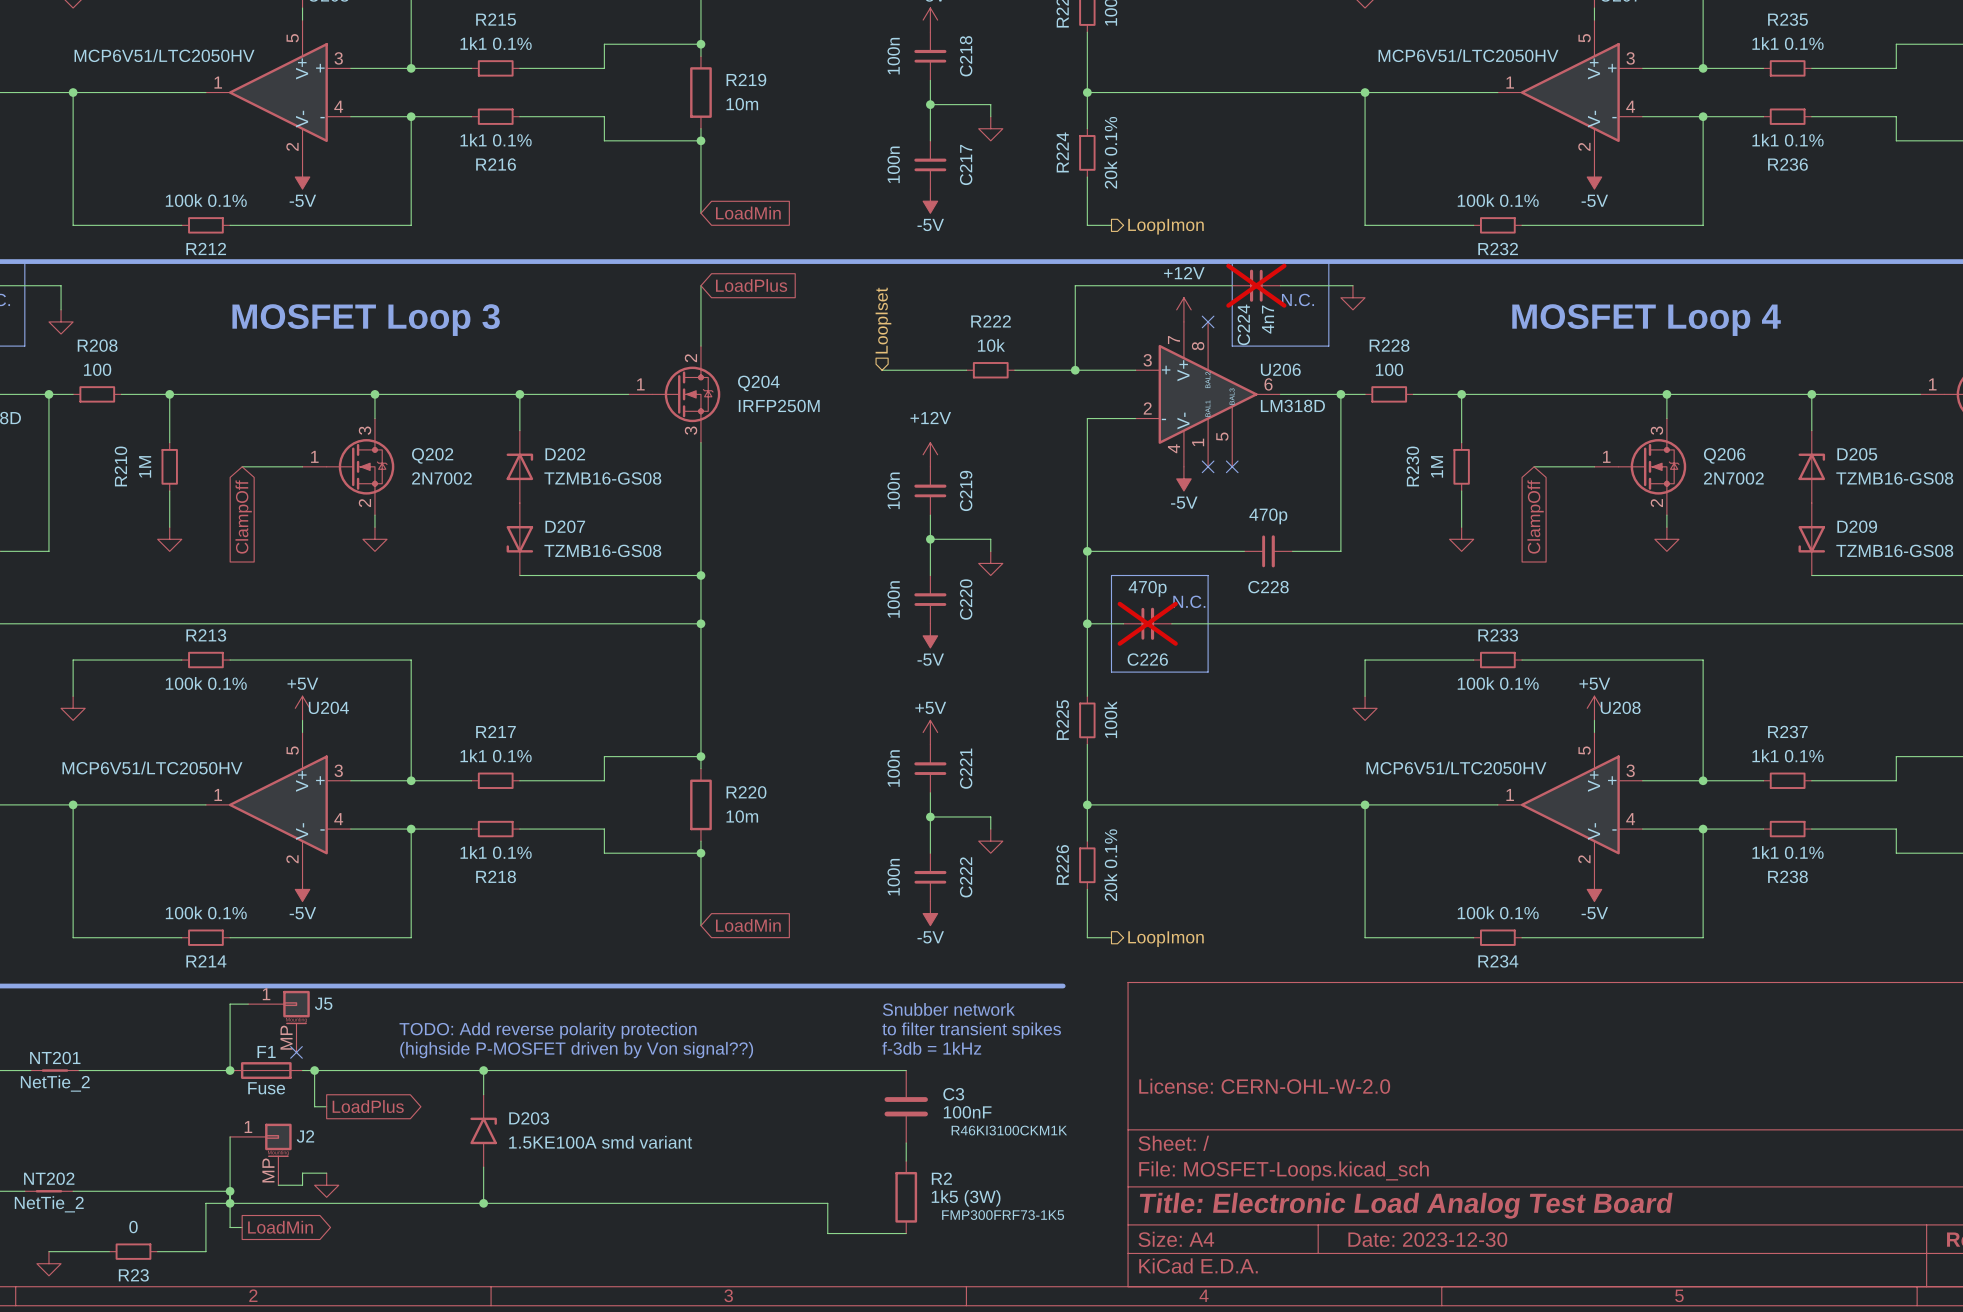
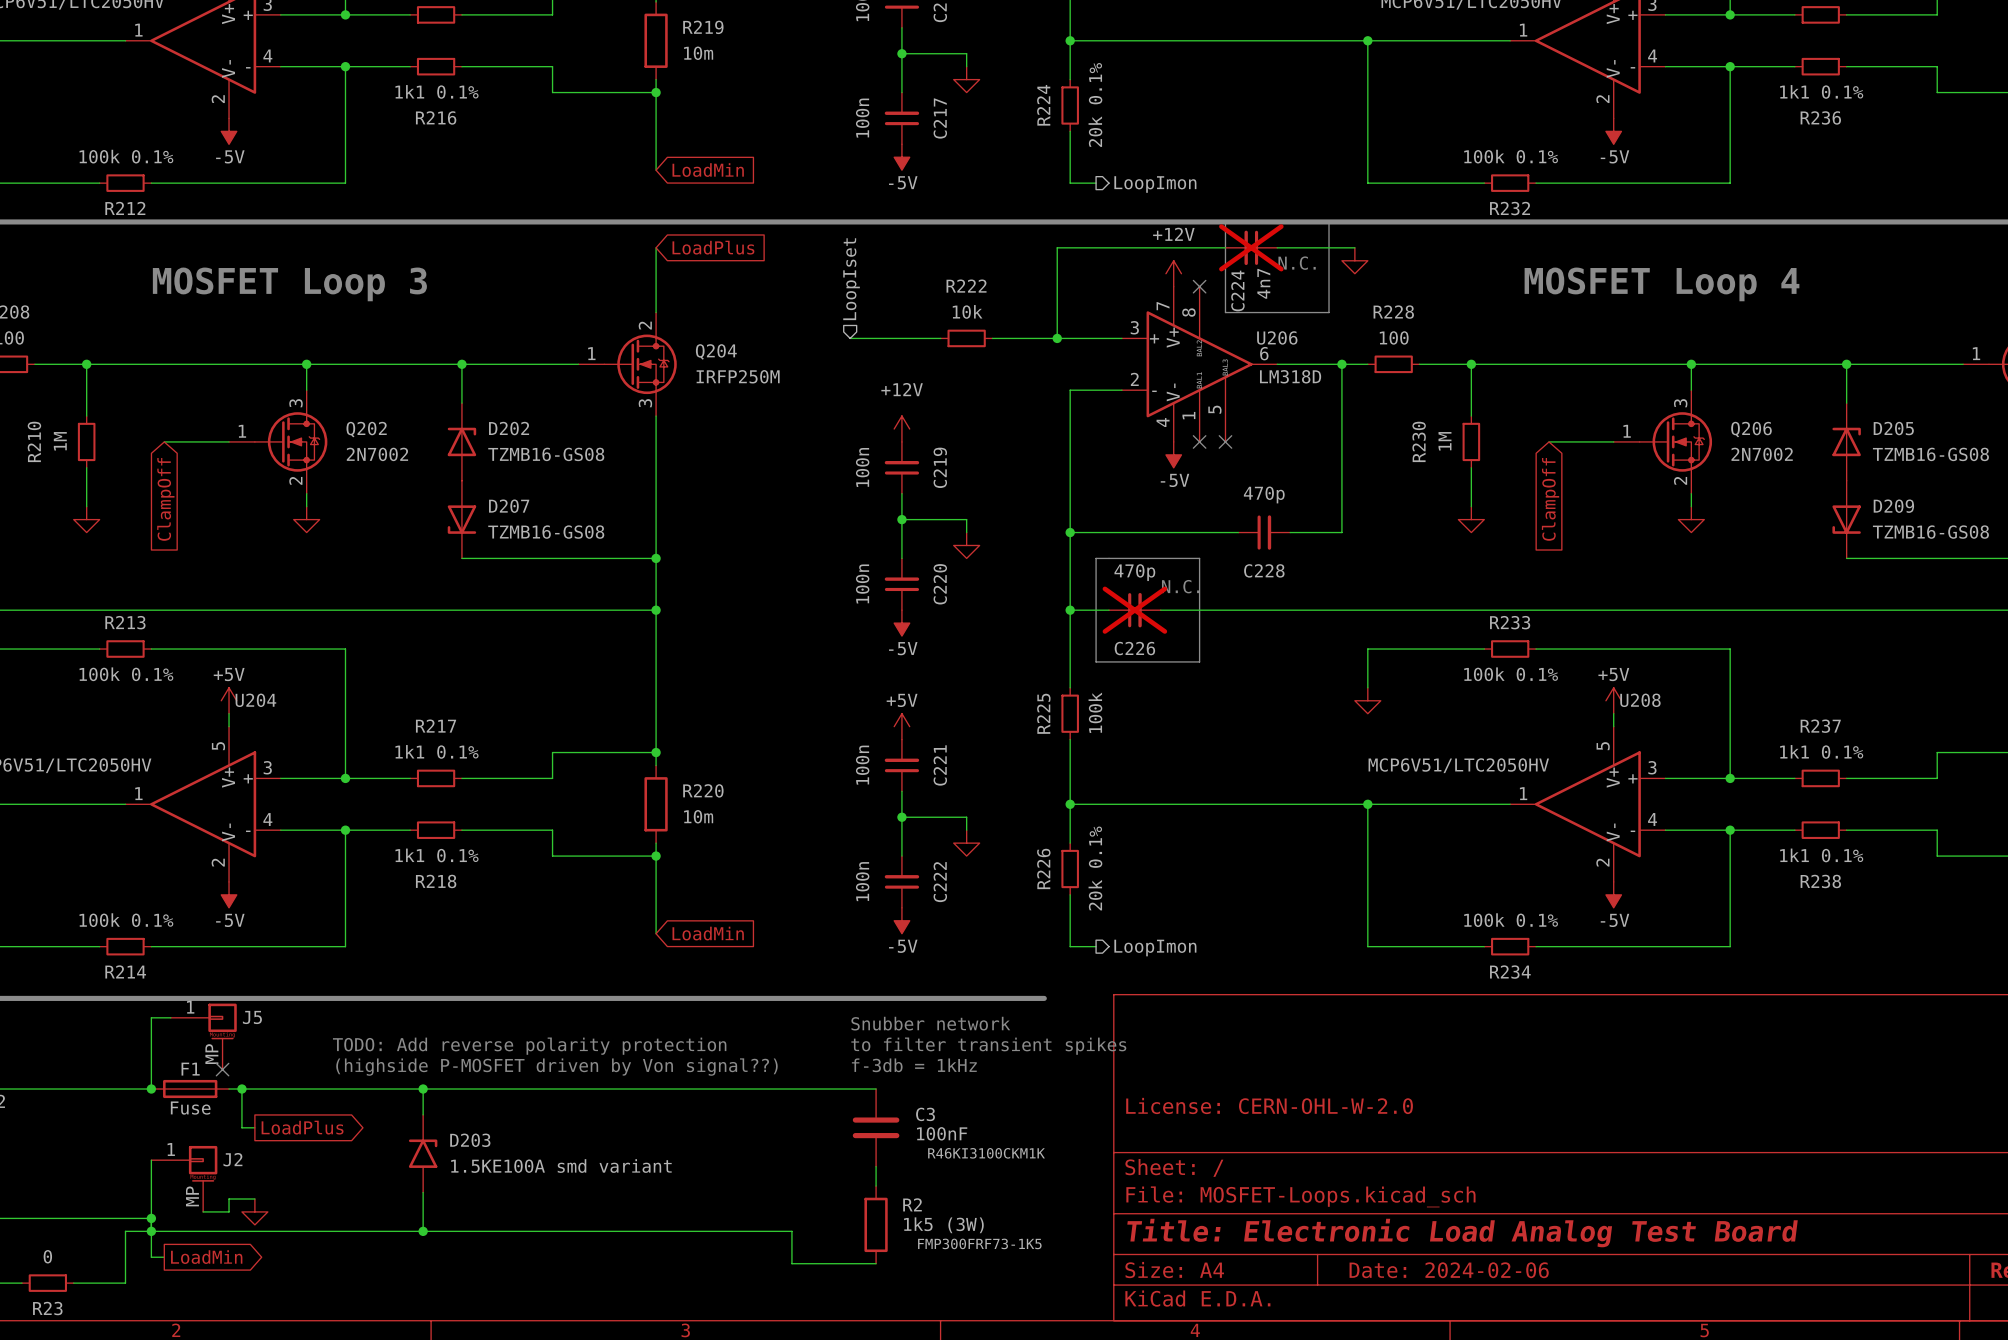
title block: Date: 2023-12-30 (1427, 1239) -> Date: 2024-02-06 (1449, 1270)

